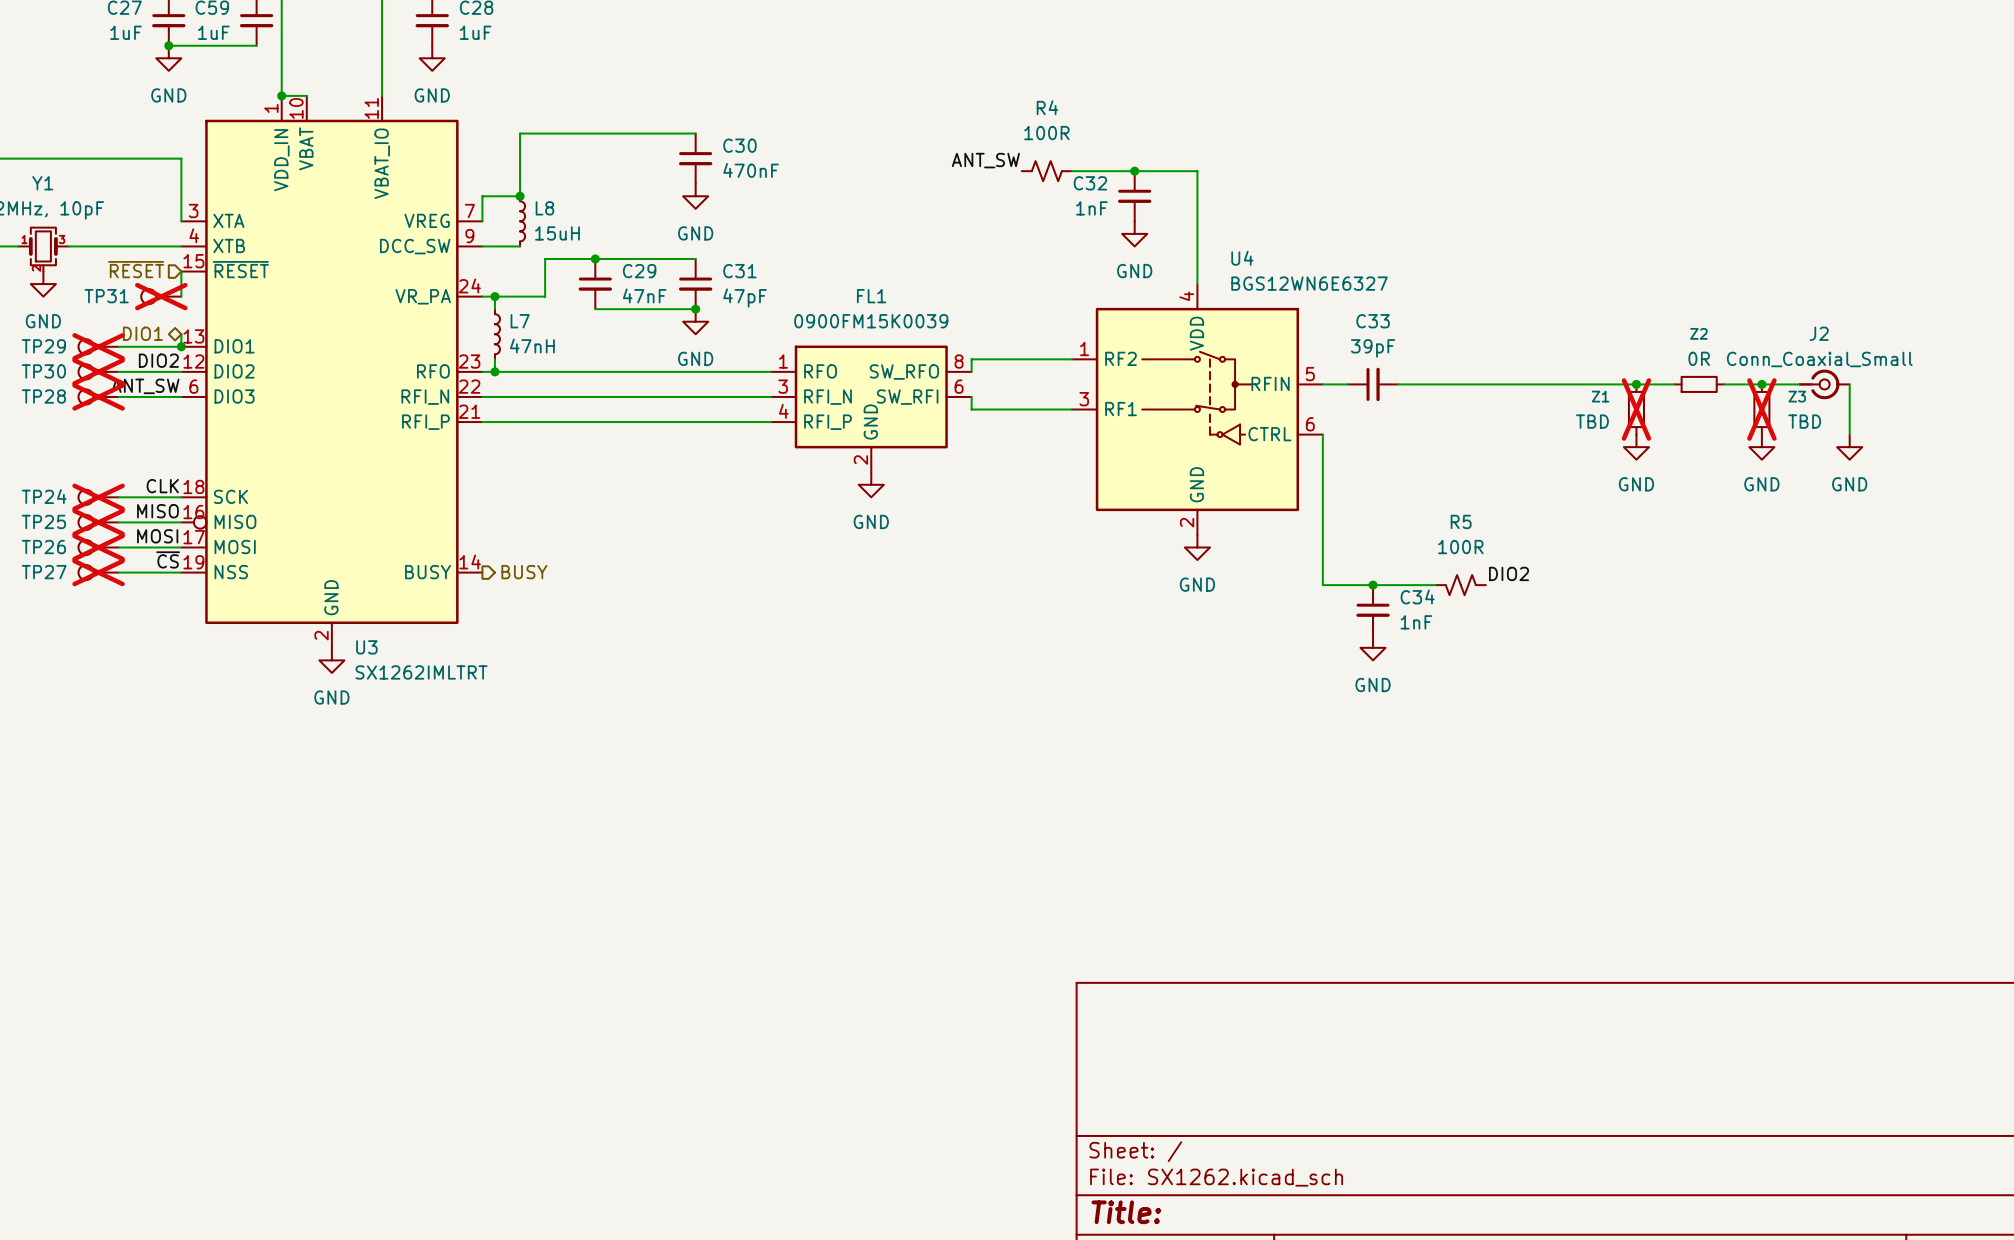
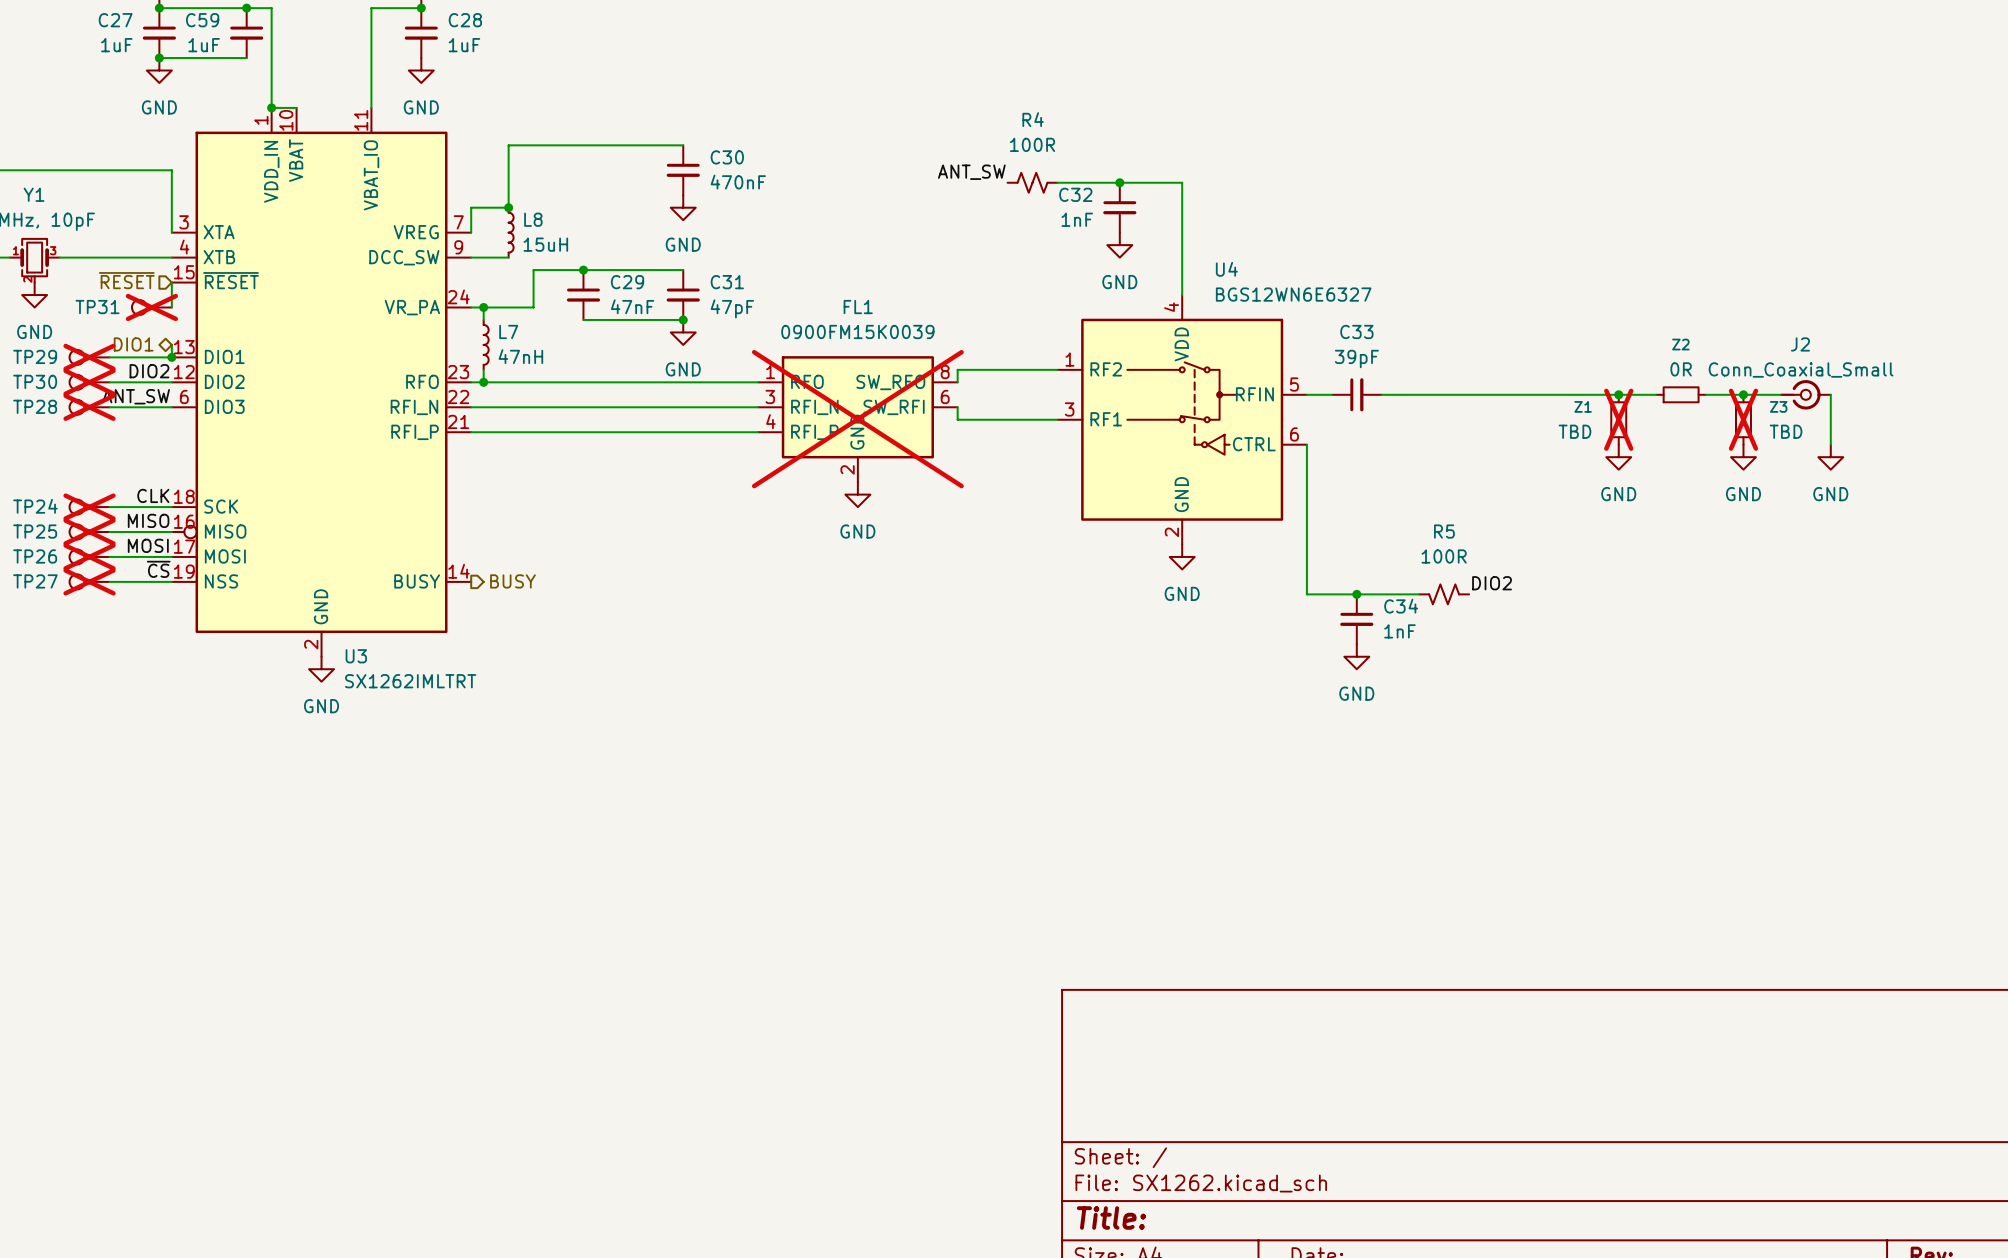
FL1 do-not-place cross: none -> (857, 419)

